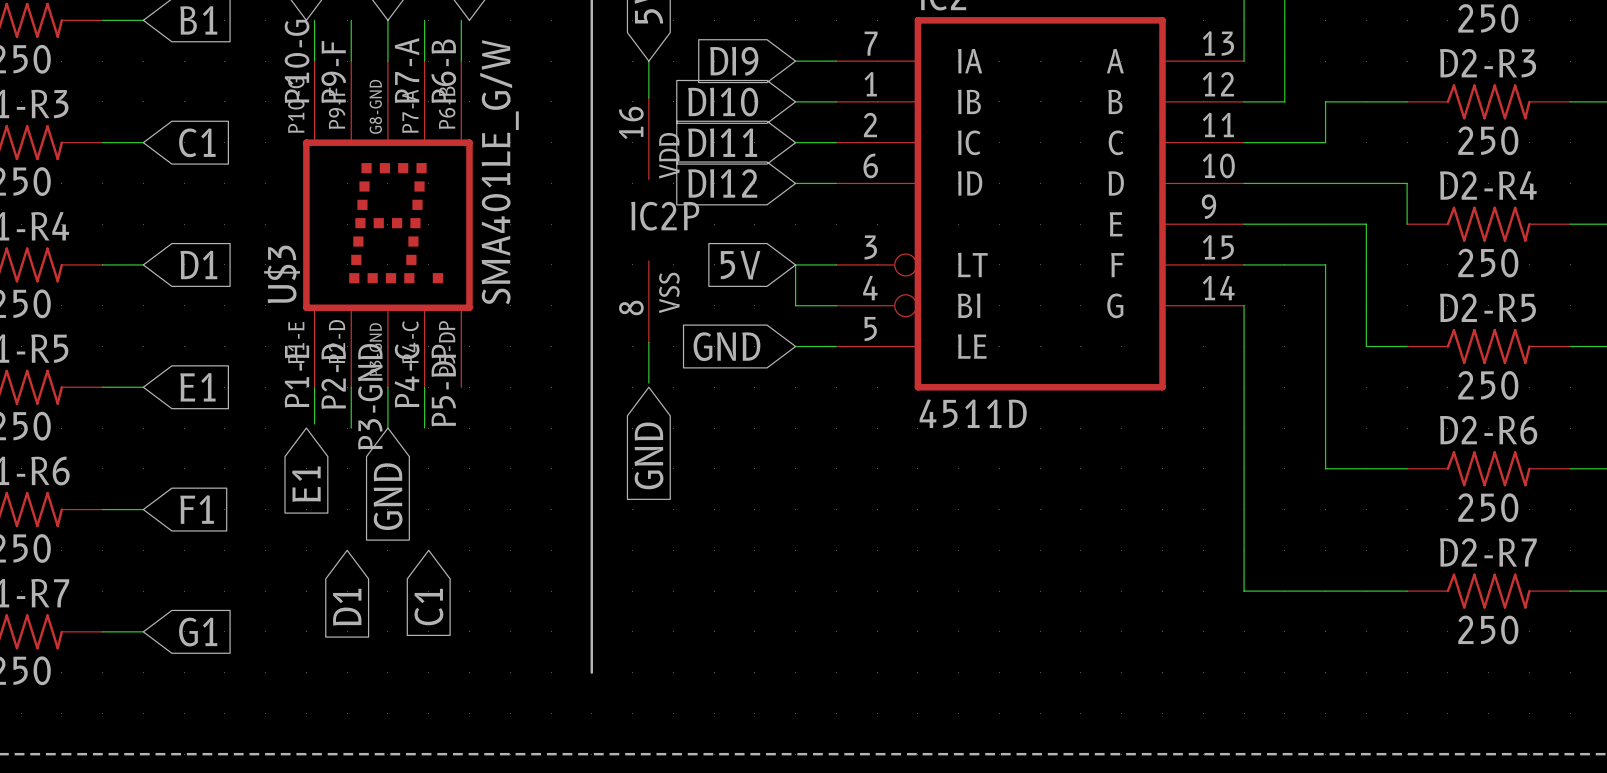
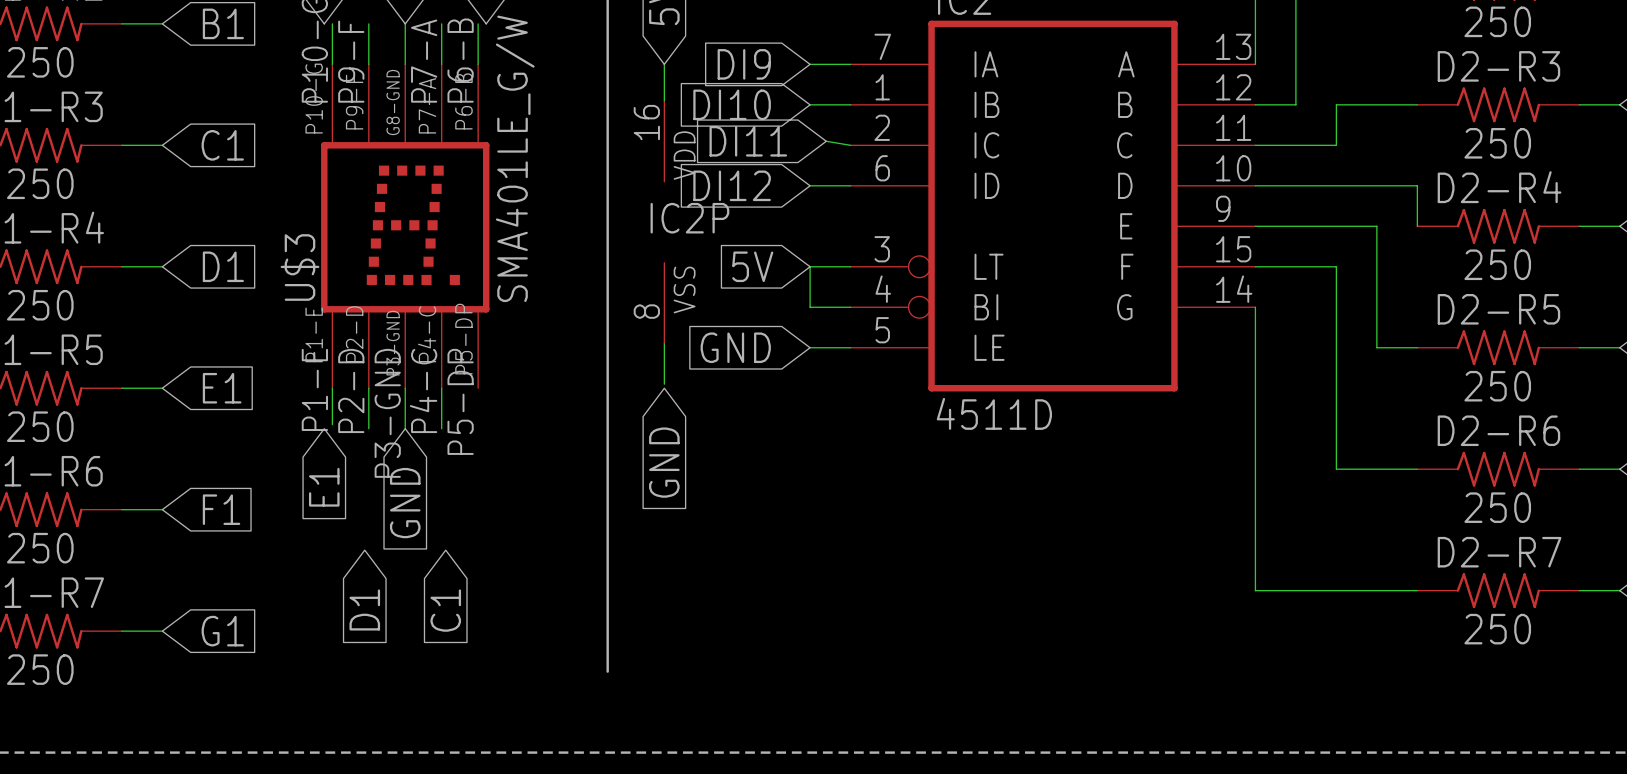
global label position: DI11 (722, 142) -> DI11 (748, 141)
wire: (795, 142) (836, 142) -> (826, 141) (850, 145)

